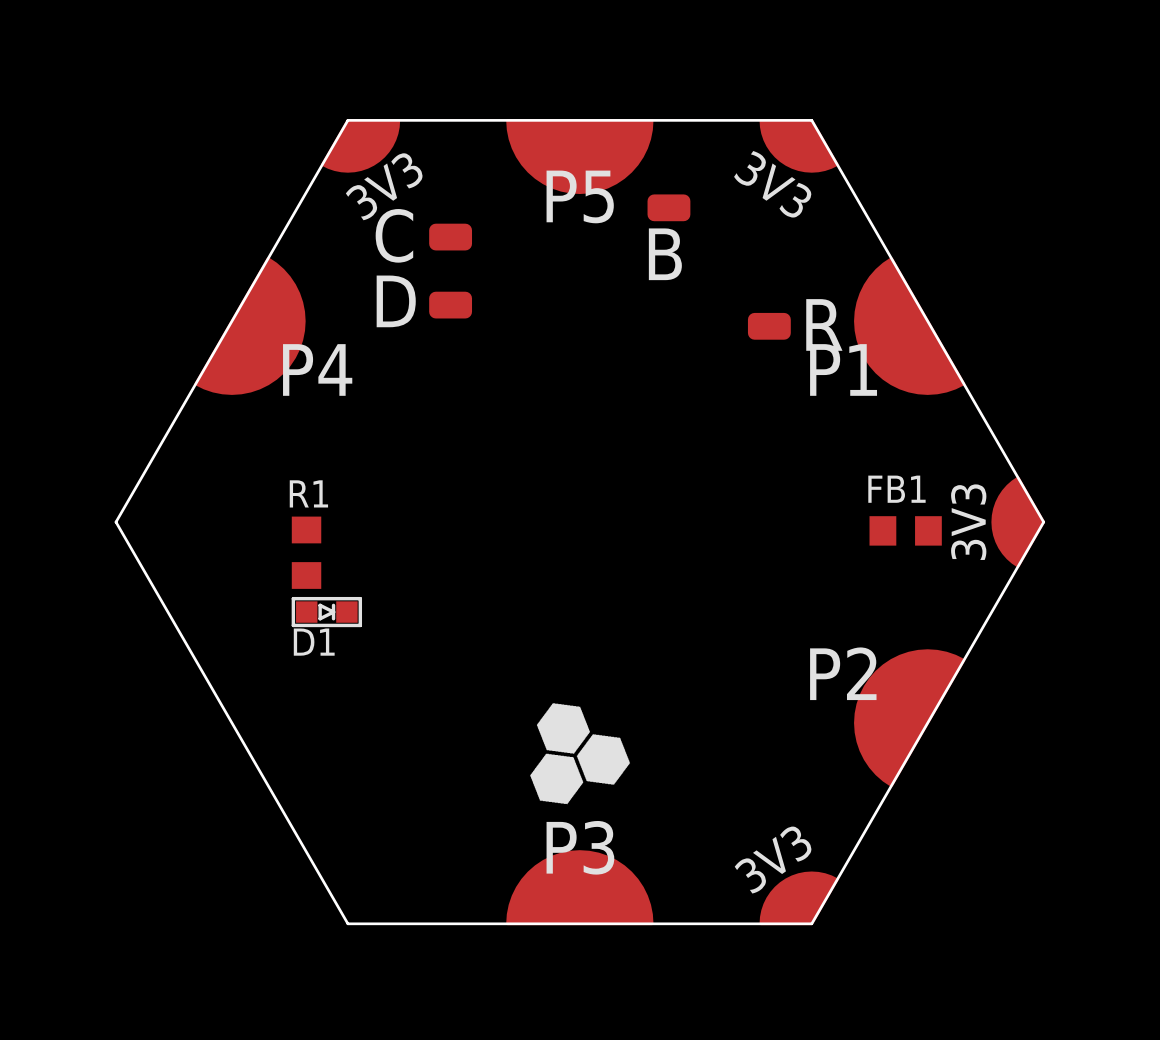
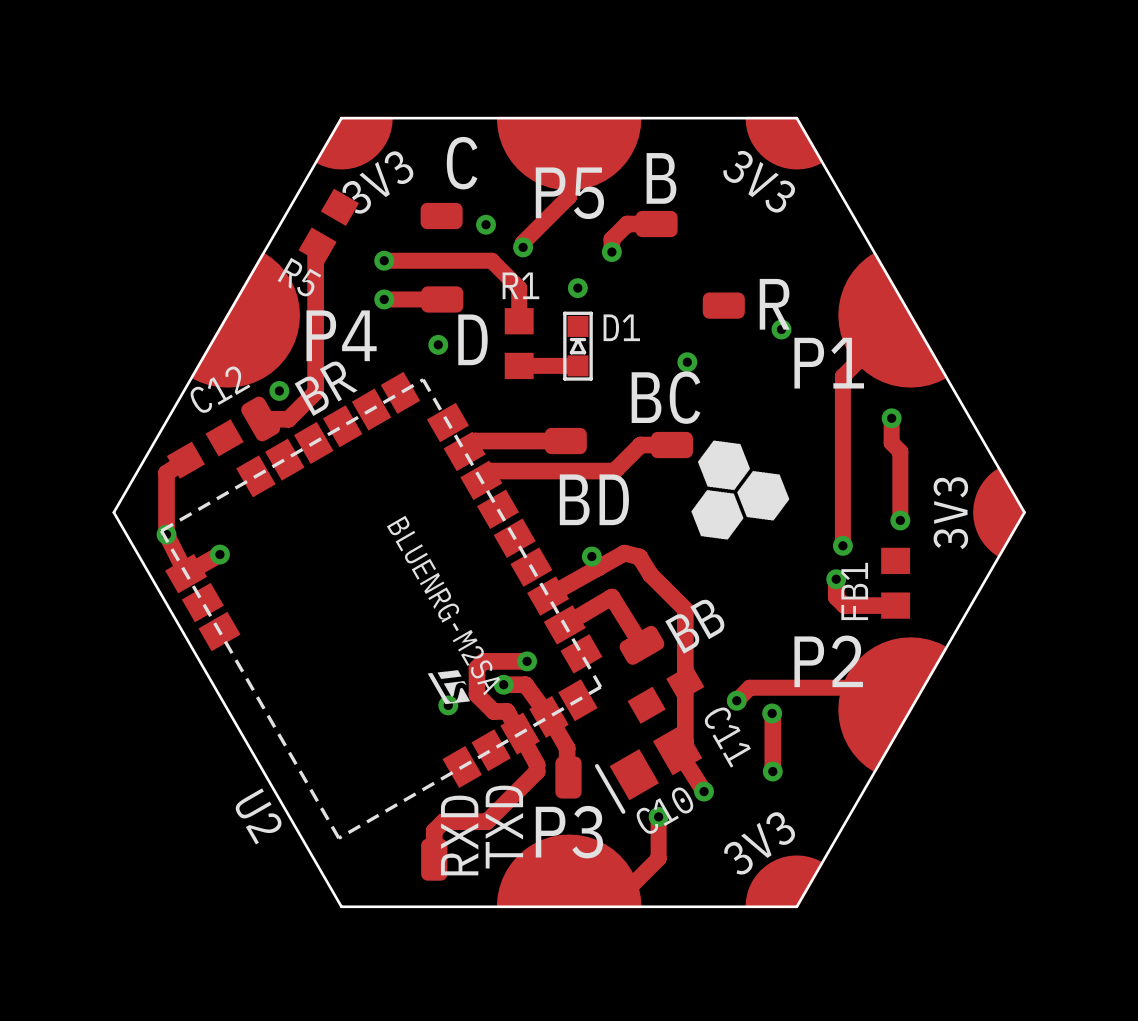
track: none -> (569, 136) (569, 196) (523, 242) (523, 247)
B position: (668, 207) -> (656, 224)
via: none -> (486, 224)
track: none -> (656, 224) (627, 224) (611, 239) (611, 252)
R5: none -> (328, 226)
C name position: C (394, 235) -> C (462, 163)
C position: (450, 237) -> (441, 216)
track: none -> (317, 246) (315, 248) (315, 392) (288, 419) (260, 419)
via: none -> (523, 247)
B name position: B (665, 254) -> B (661, 178)
via: none -> (611, 252)
track: none -> (384, 260) (491, 260) (519, 288) (519, 321)
via: none -> (384, 260)
via: none -> (577, 288)
D name position: D (396, 301) -> D (472, 339)
track: none -> (384, 299) (434, 299)
via: none -> (384, 299)
R position: (769, 326) -> (723, 305)
track: none -> (894, 324) (842, 376) (842, 545)
via: none -> (781, 329)
via: none -> (438, 344)
text position: P4 (317, 369) -> P4 (341, 335)
via: none -> (687, 362)
track: none -> (519, 365) (578, 365)
via: none -> (279, 390)
BR: none -> (260, 418)
track: none -> (891, 418) (891, 442) (900, 451) (900, 520)
via: none -> (891, 418)
drawing: none -> [691, 440, 790, 540]
track: none -> (565, 441) (475, 441) (464, 451)
BD: none -> (565, 441)
track: none -> (671, 445) (640, 445) (614, 471) (490, 471) (481, 480)
BC: none -> (671, 445)
C12: none -> (205, 449)
track: none -> (185, 460) (166, 473) (166, 534) (186, 573) (219, 554)
FB1 name position: FB1 (896, 489) -> FB1 (854, 591)
FB1 rotation: 0° (905, 530) -> 90° clockwise (895, 583)
FB1 position: (905, 530) -> (895, 583)
via: none -> (900, 520)
via: none -> (166, 534)
R1 position: (306, 552) -> (519, 343)
via: none -> (842, 545)
via: none -> (219, 554)
via: none -> (591, 556)
track: none -> (836, 579) (836, 597) (844, 605) (895, 605)
via: none -> (836, 579)
track: none -> (548, 596) (624, 553) (639, 557) (650, 574) (685, 609) (685, 741) (677, 749) (704, 791)
D1 rotation: 0° (326, 612) -> 90° counterclockwise (578, 346)
D1 position: (326, 612) -> (578, 346)
U2: none -> (381, 605)
track: none -> (564, 624) (611, 597) (641, 645)
BB: none -> (641, 645)
track: none -> (527, 661) (483, 661) (477, 668) (477, 694) (493, 711) (507, 711) (537, 764) (537, 771) (486, 821) (443, 821) (434, 830) (434, 859)
via: none -> (527, 661)
track: none -> (503, 684) (525, 684) (548, 716) (567, 748) (568, 777)
via: none -> (503, 684)
drawing: [530, 703, 631, 805] -> none
C11: none -> (665, 694)
via: none -> (736, 700)
track: none -> (894, 700) (882, 687) (749, 687) (736, 700)
via: none -> (448, 705)
track: none -> (772, 713) (772, 771)
via: none -> (772, 713)
C10: none -> (648, 768)
via: none -> (772, 771)
TXD: none -> (568, 777)
via: none -> (704, 791)
track: none -> (658, 816) (658, 858) (628, 888) (569, 888)
via: none -> (658, 816)
RXD: none -> (434, 859)

